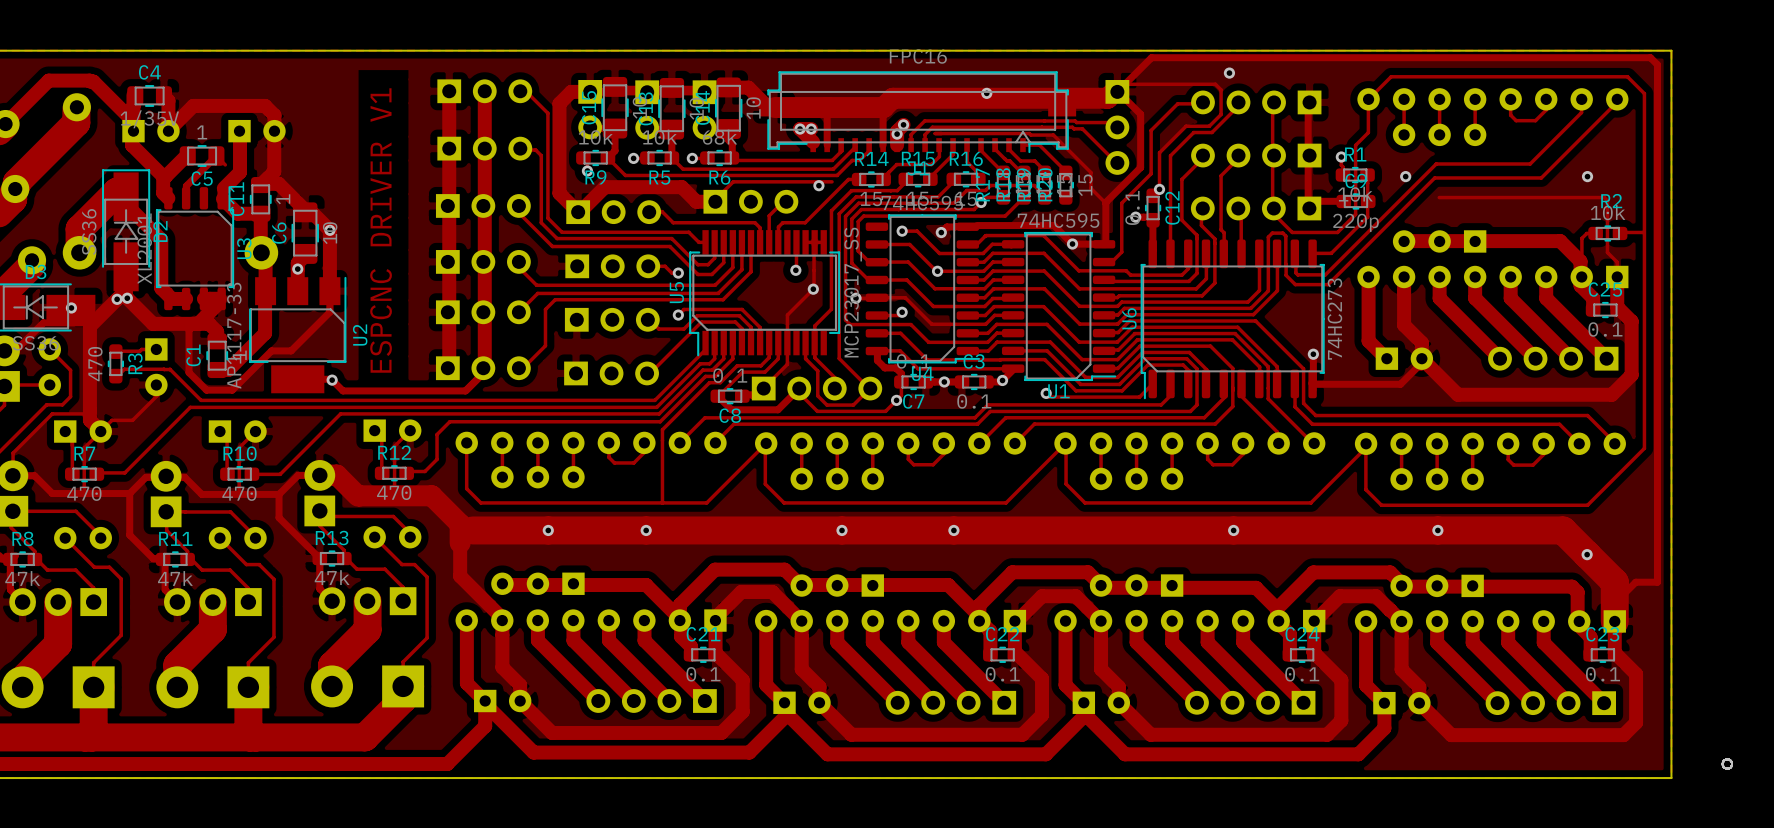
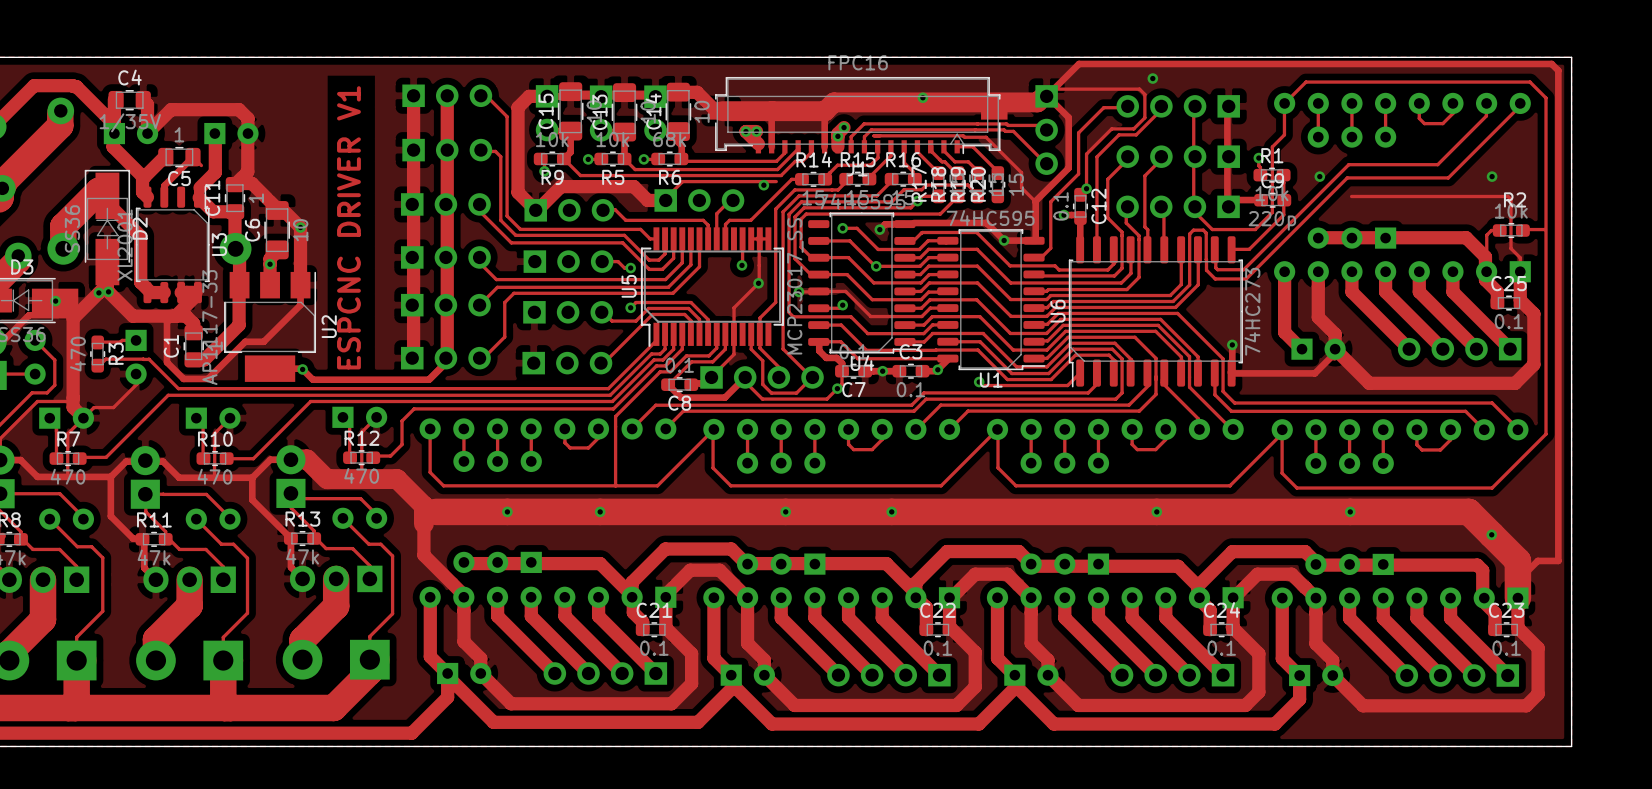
via: (1727, 764) -> none

